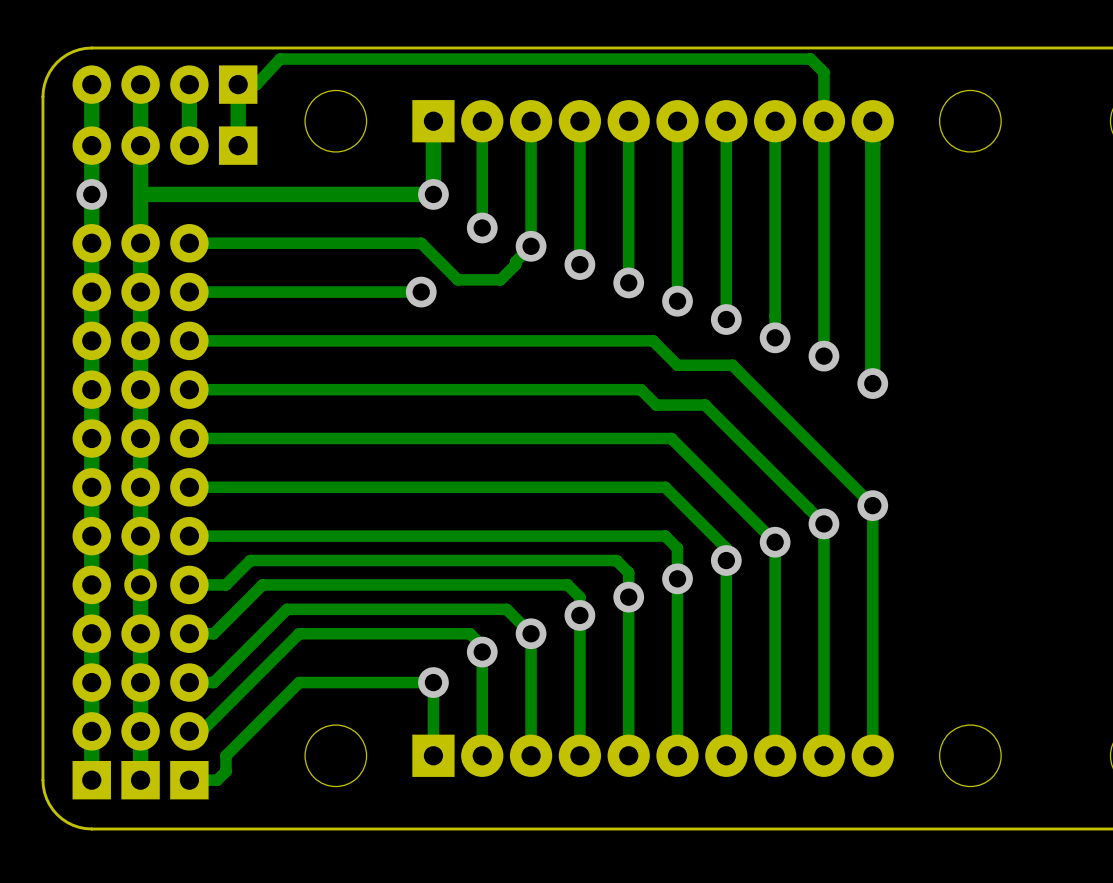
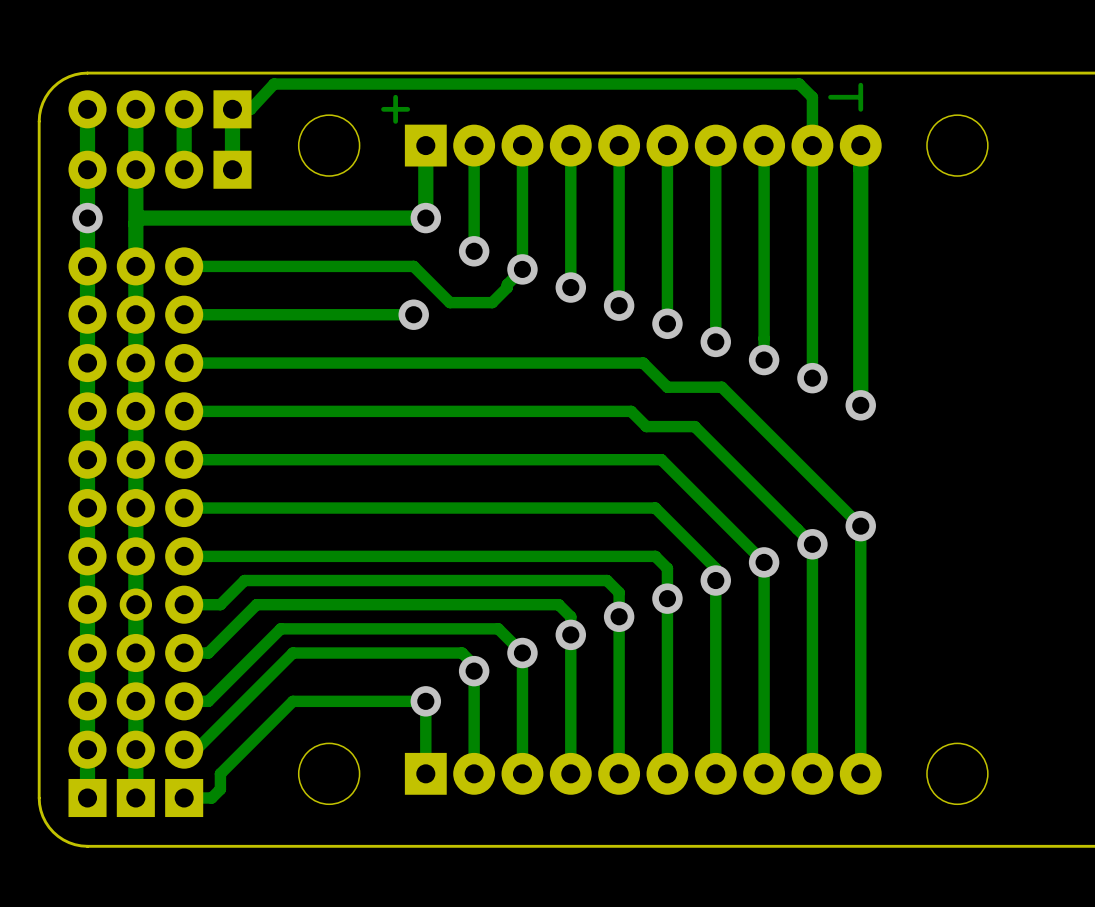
track: none -> (860, 85) (860, 109)
track: none -> (395, 97) (395, 121)
track: none -> (860, 97) (830, 97)
track: none -> (407, 109) (383, 109)

